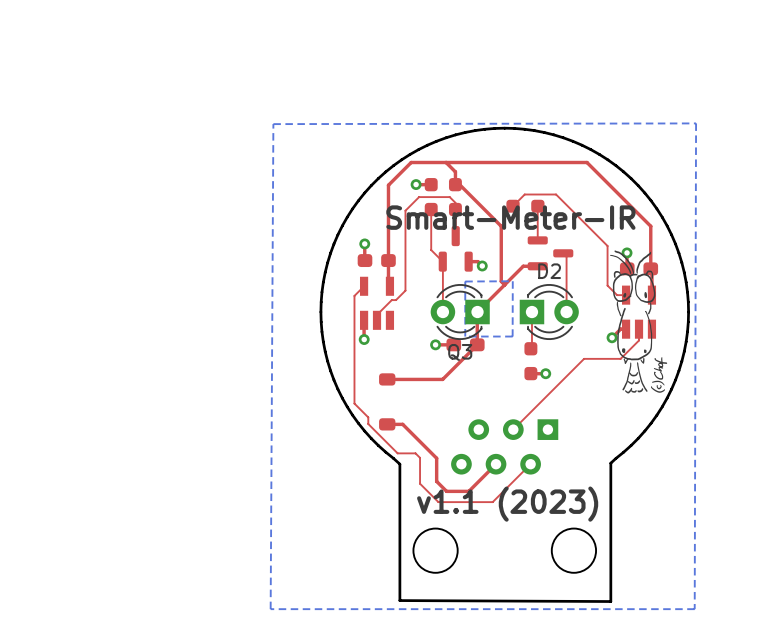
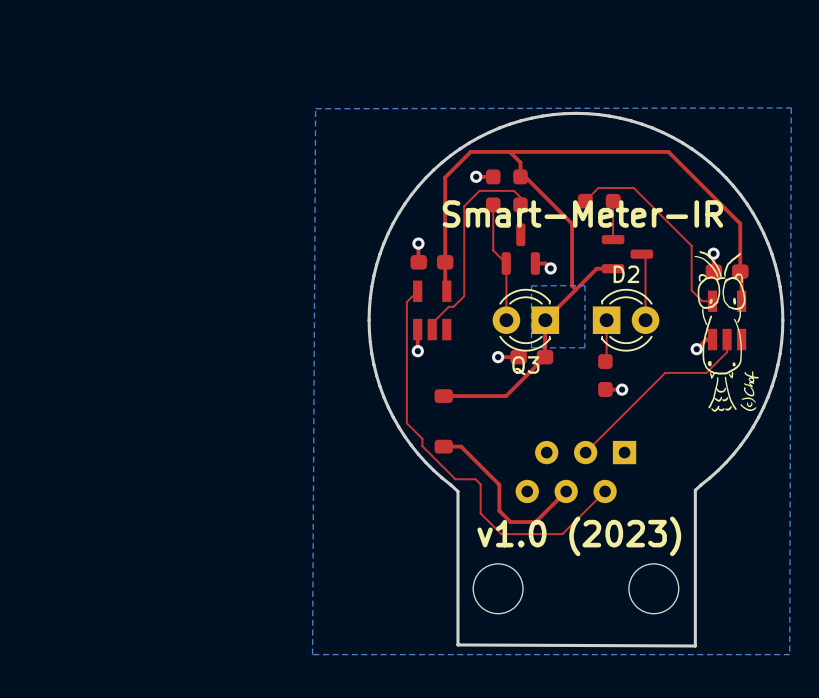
text: v1.1 (2023) (507, 504) -> v1.0 (2023) (579, 536)

